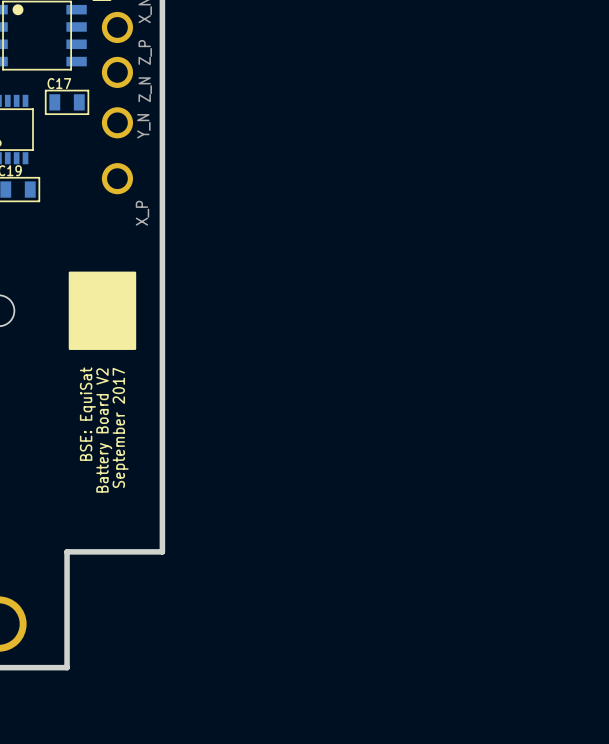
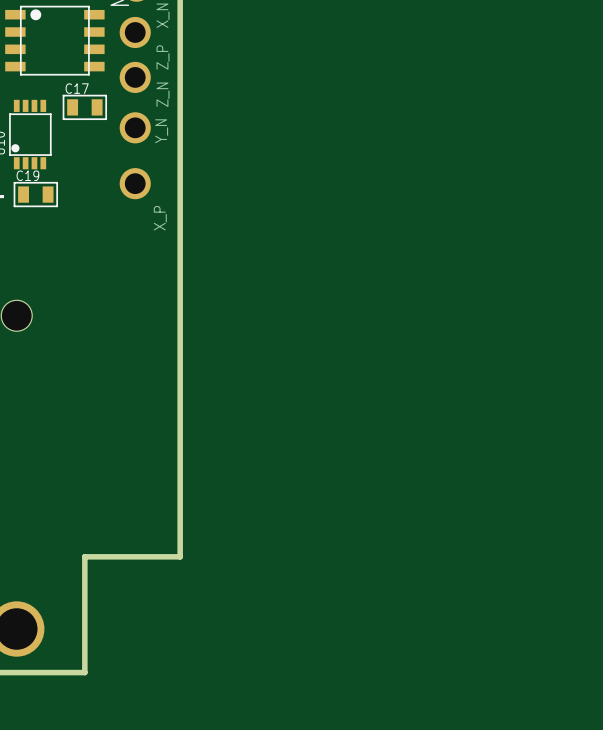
drawing: [68, 271, 137, 350] -> none
text: BSE: EquiSat (87, 414) -> none
text: September 2017 (120, 427) -> none
text: Battery Board V2 (104, 430) -> none

